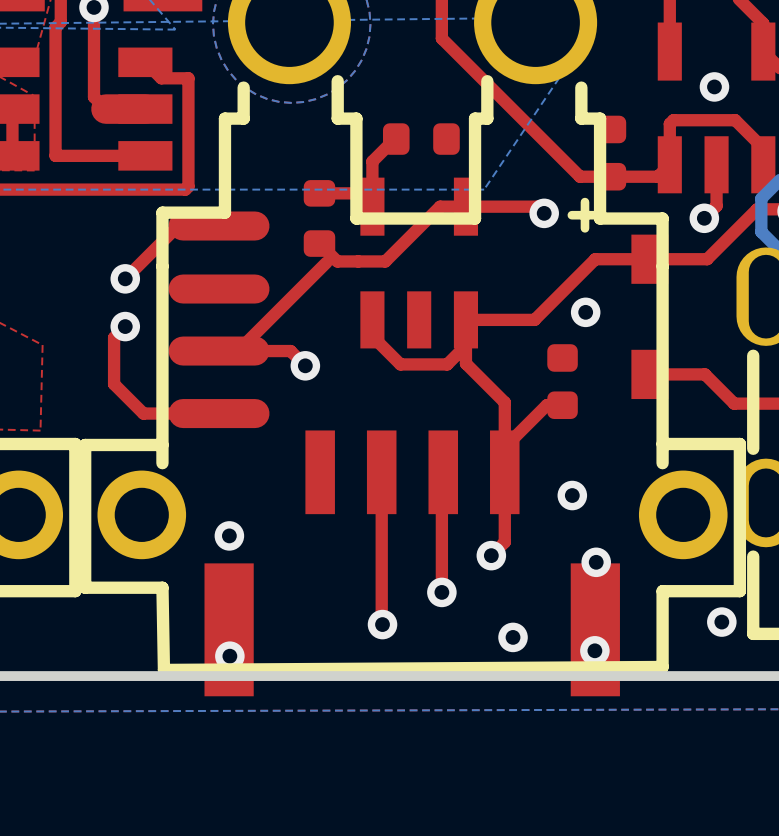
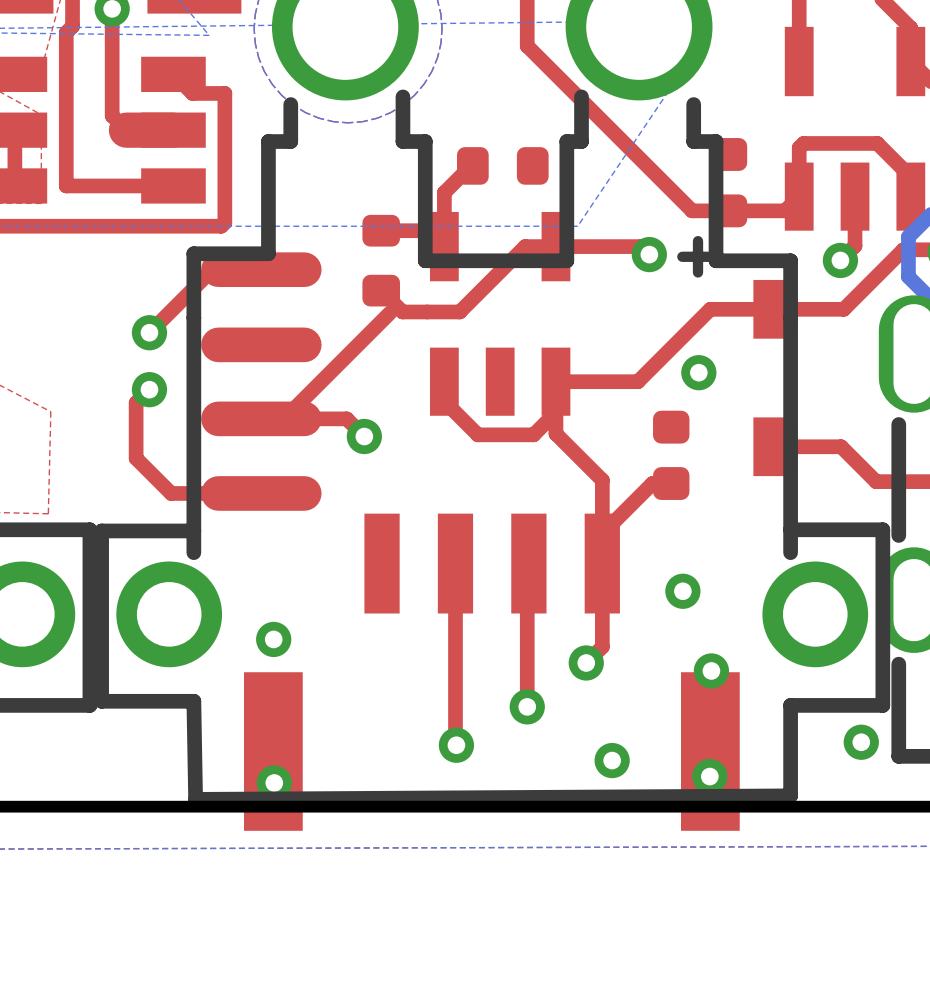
via: (714, 86) -> none

